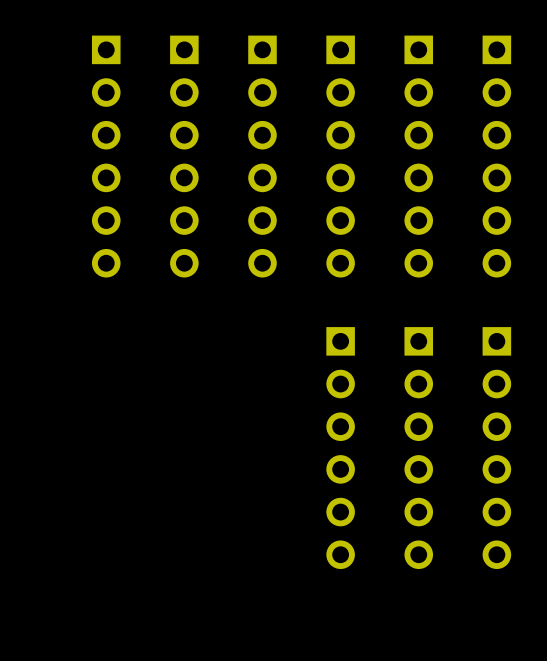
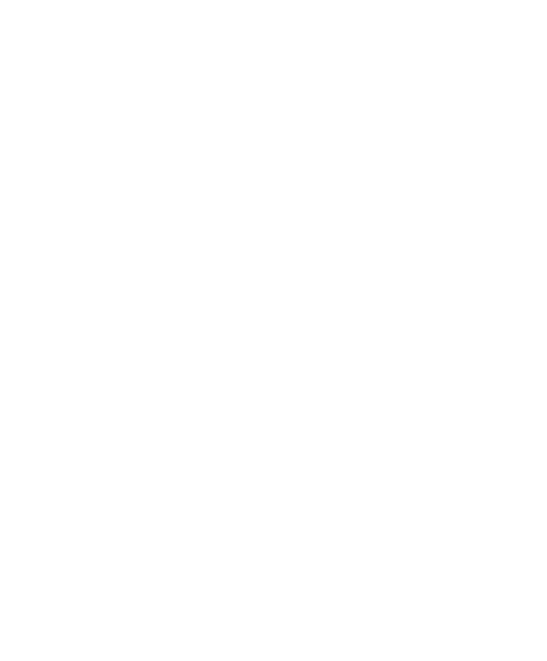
part: (106, 156) -> none
part: (184, 156) -> none
part: (262, 156) -> none
part: (340, 156) -> none
part: (418, 156) -> none
part: (496, 156) -> none
part: (340, 448) -> none
part: (418, 448) -> none
part: (496, 448) -> none

